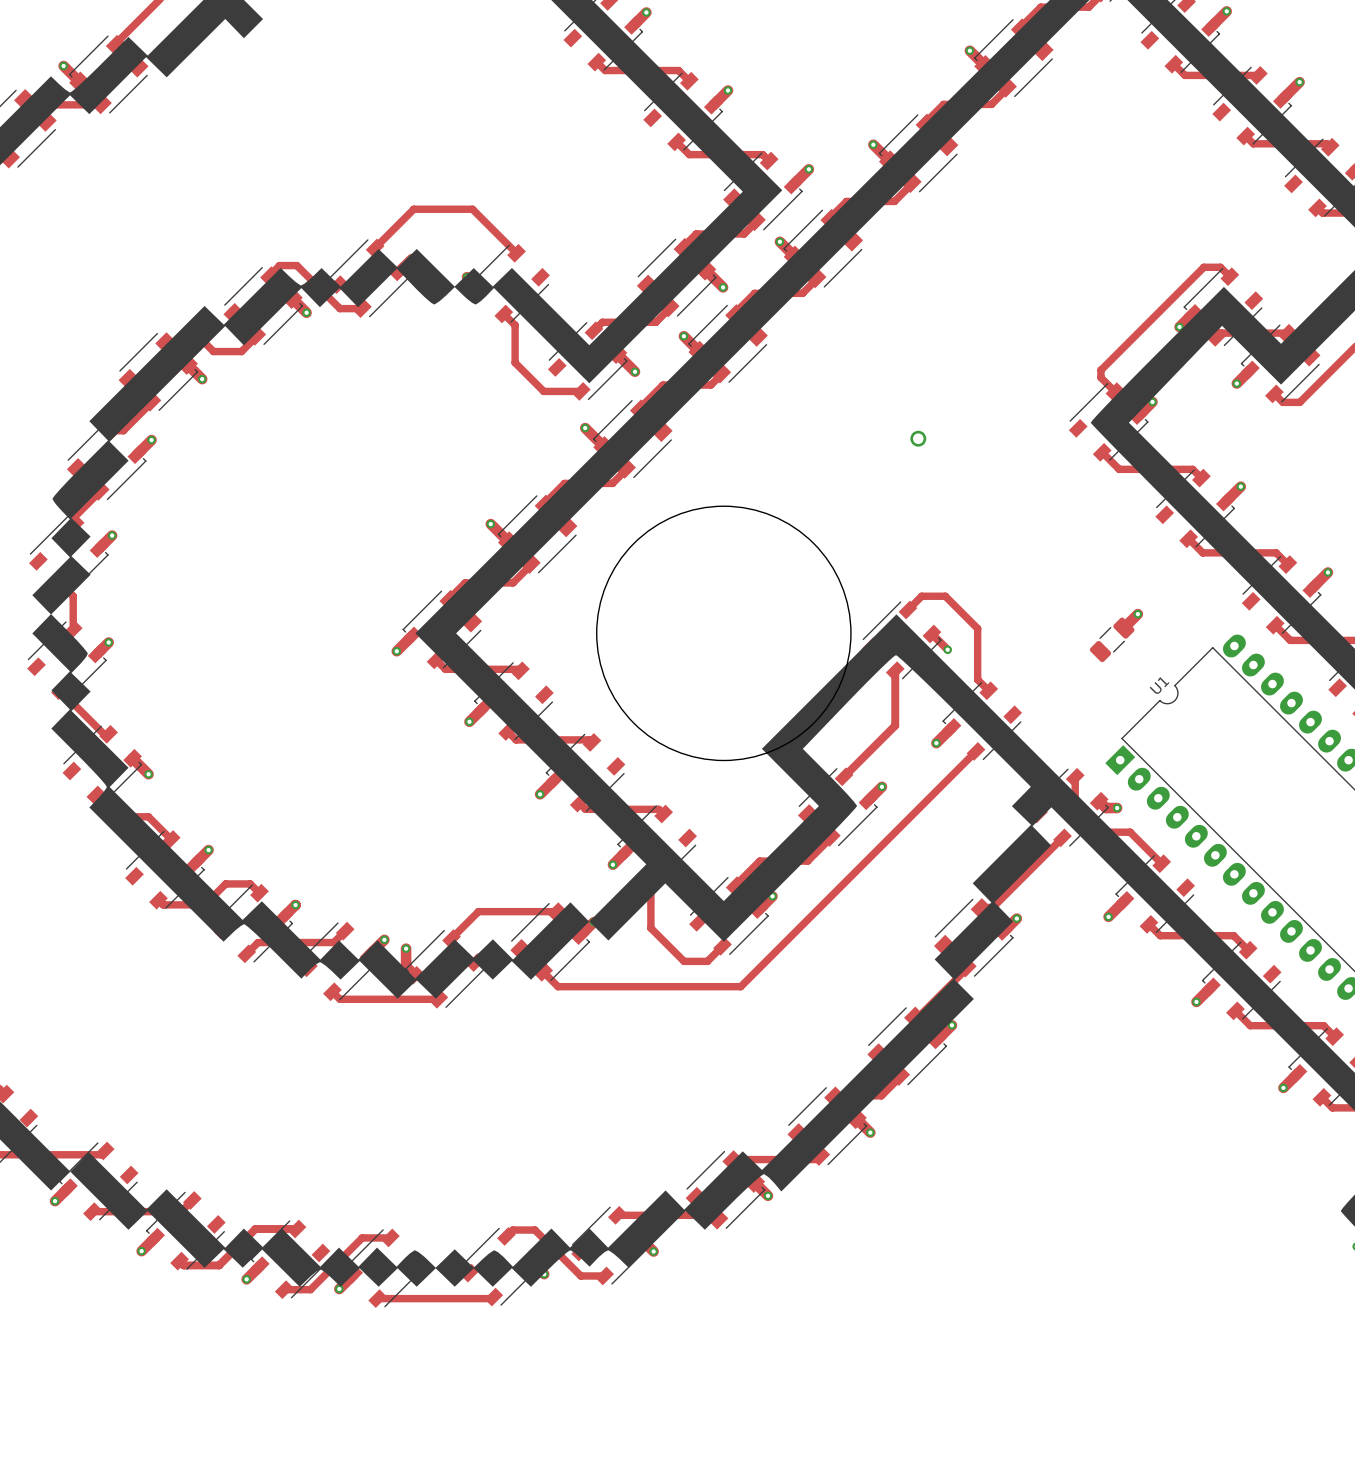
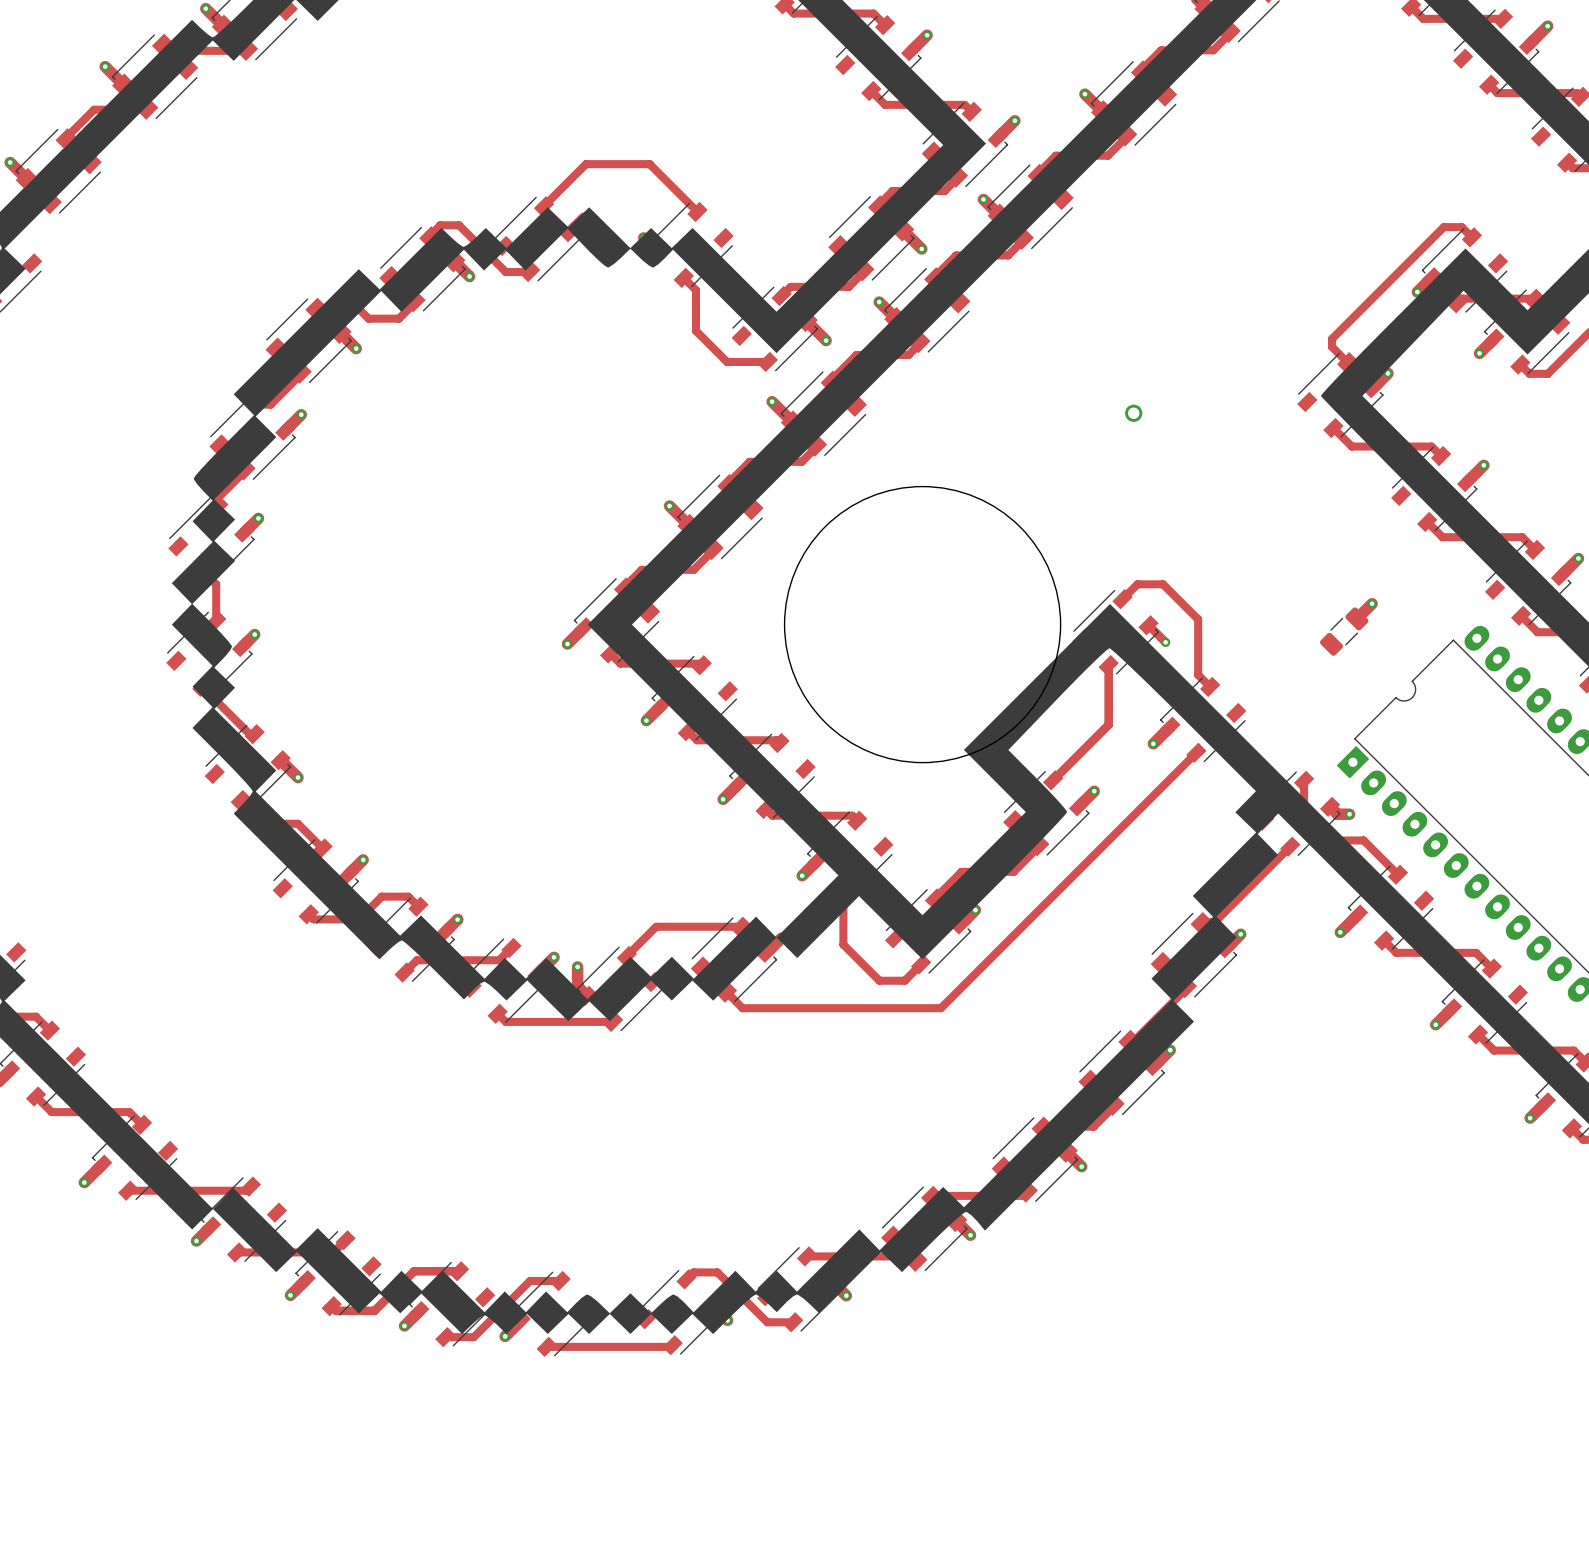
U1 name: U1 (1159, 685) -> none

